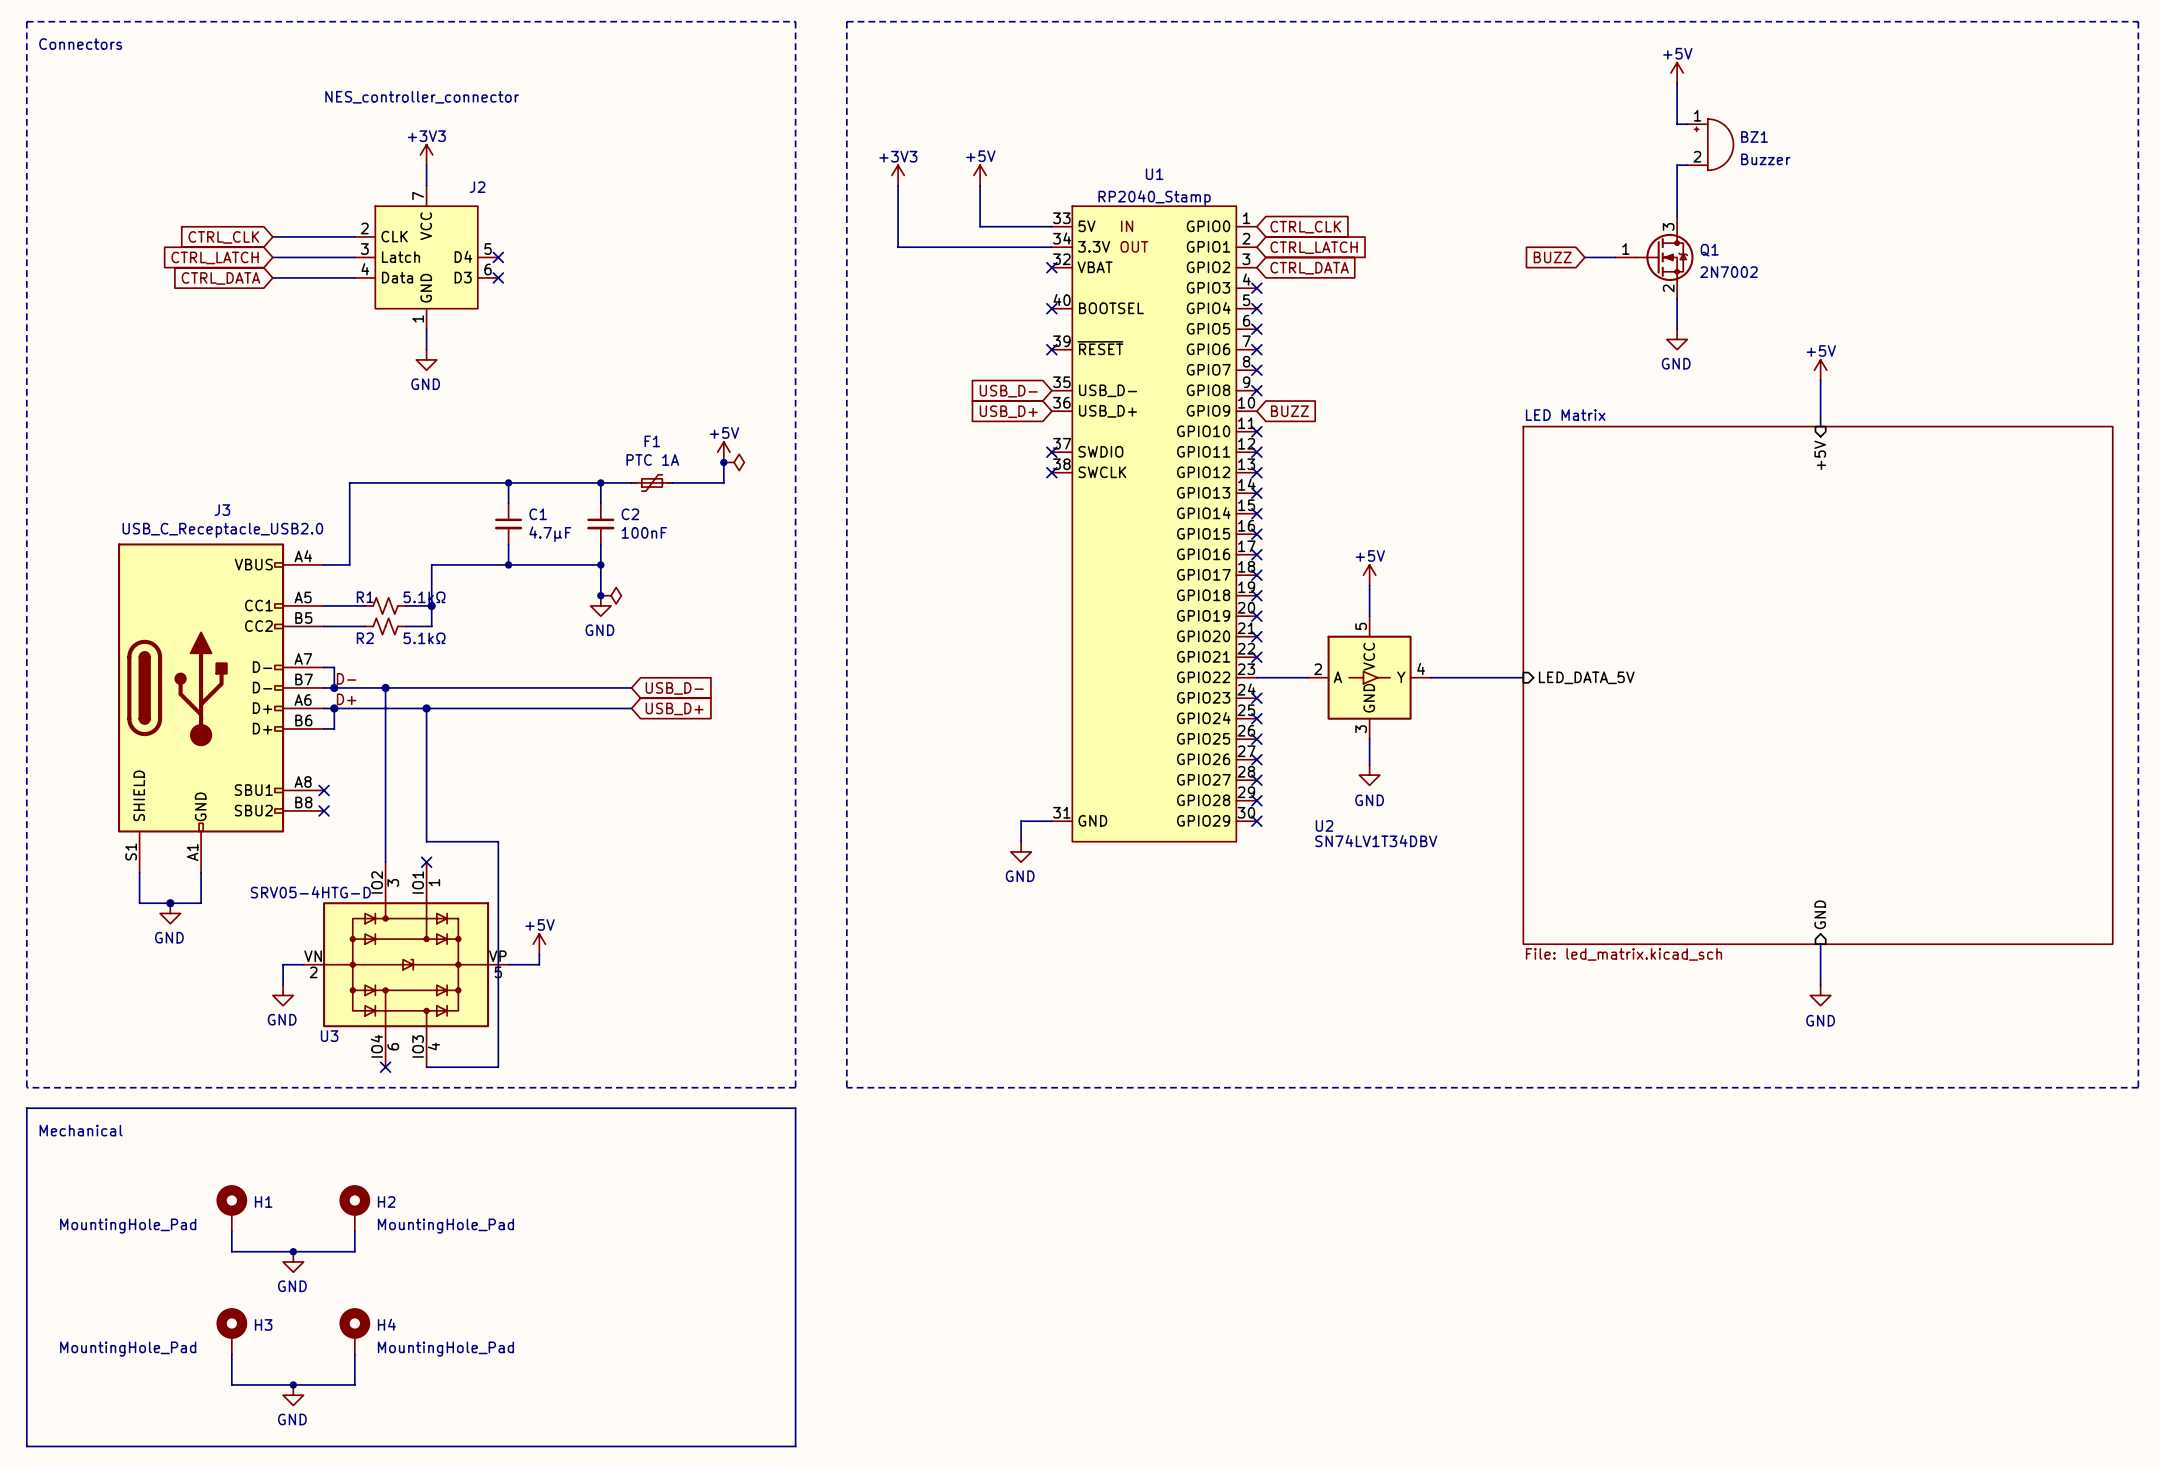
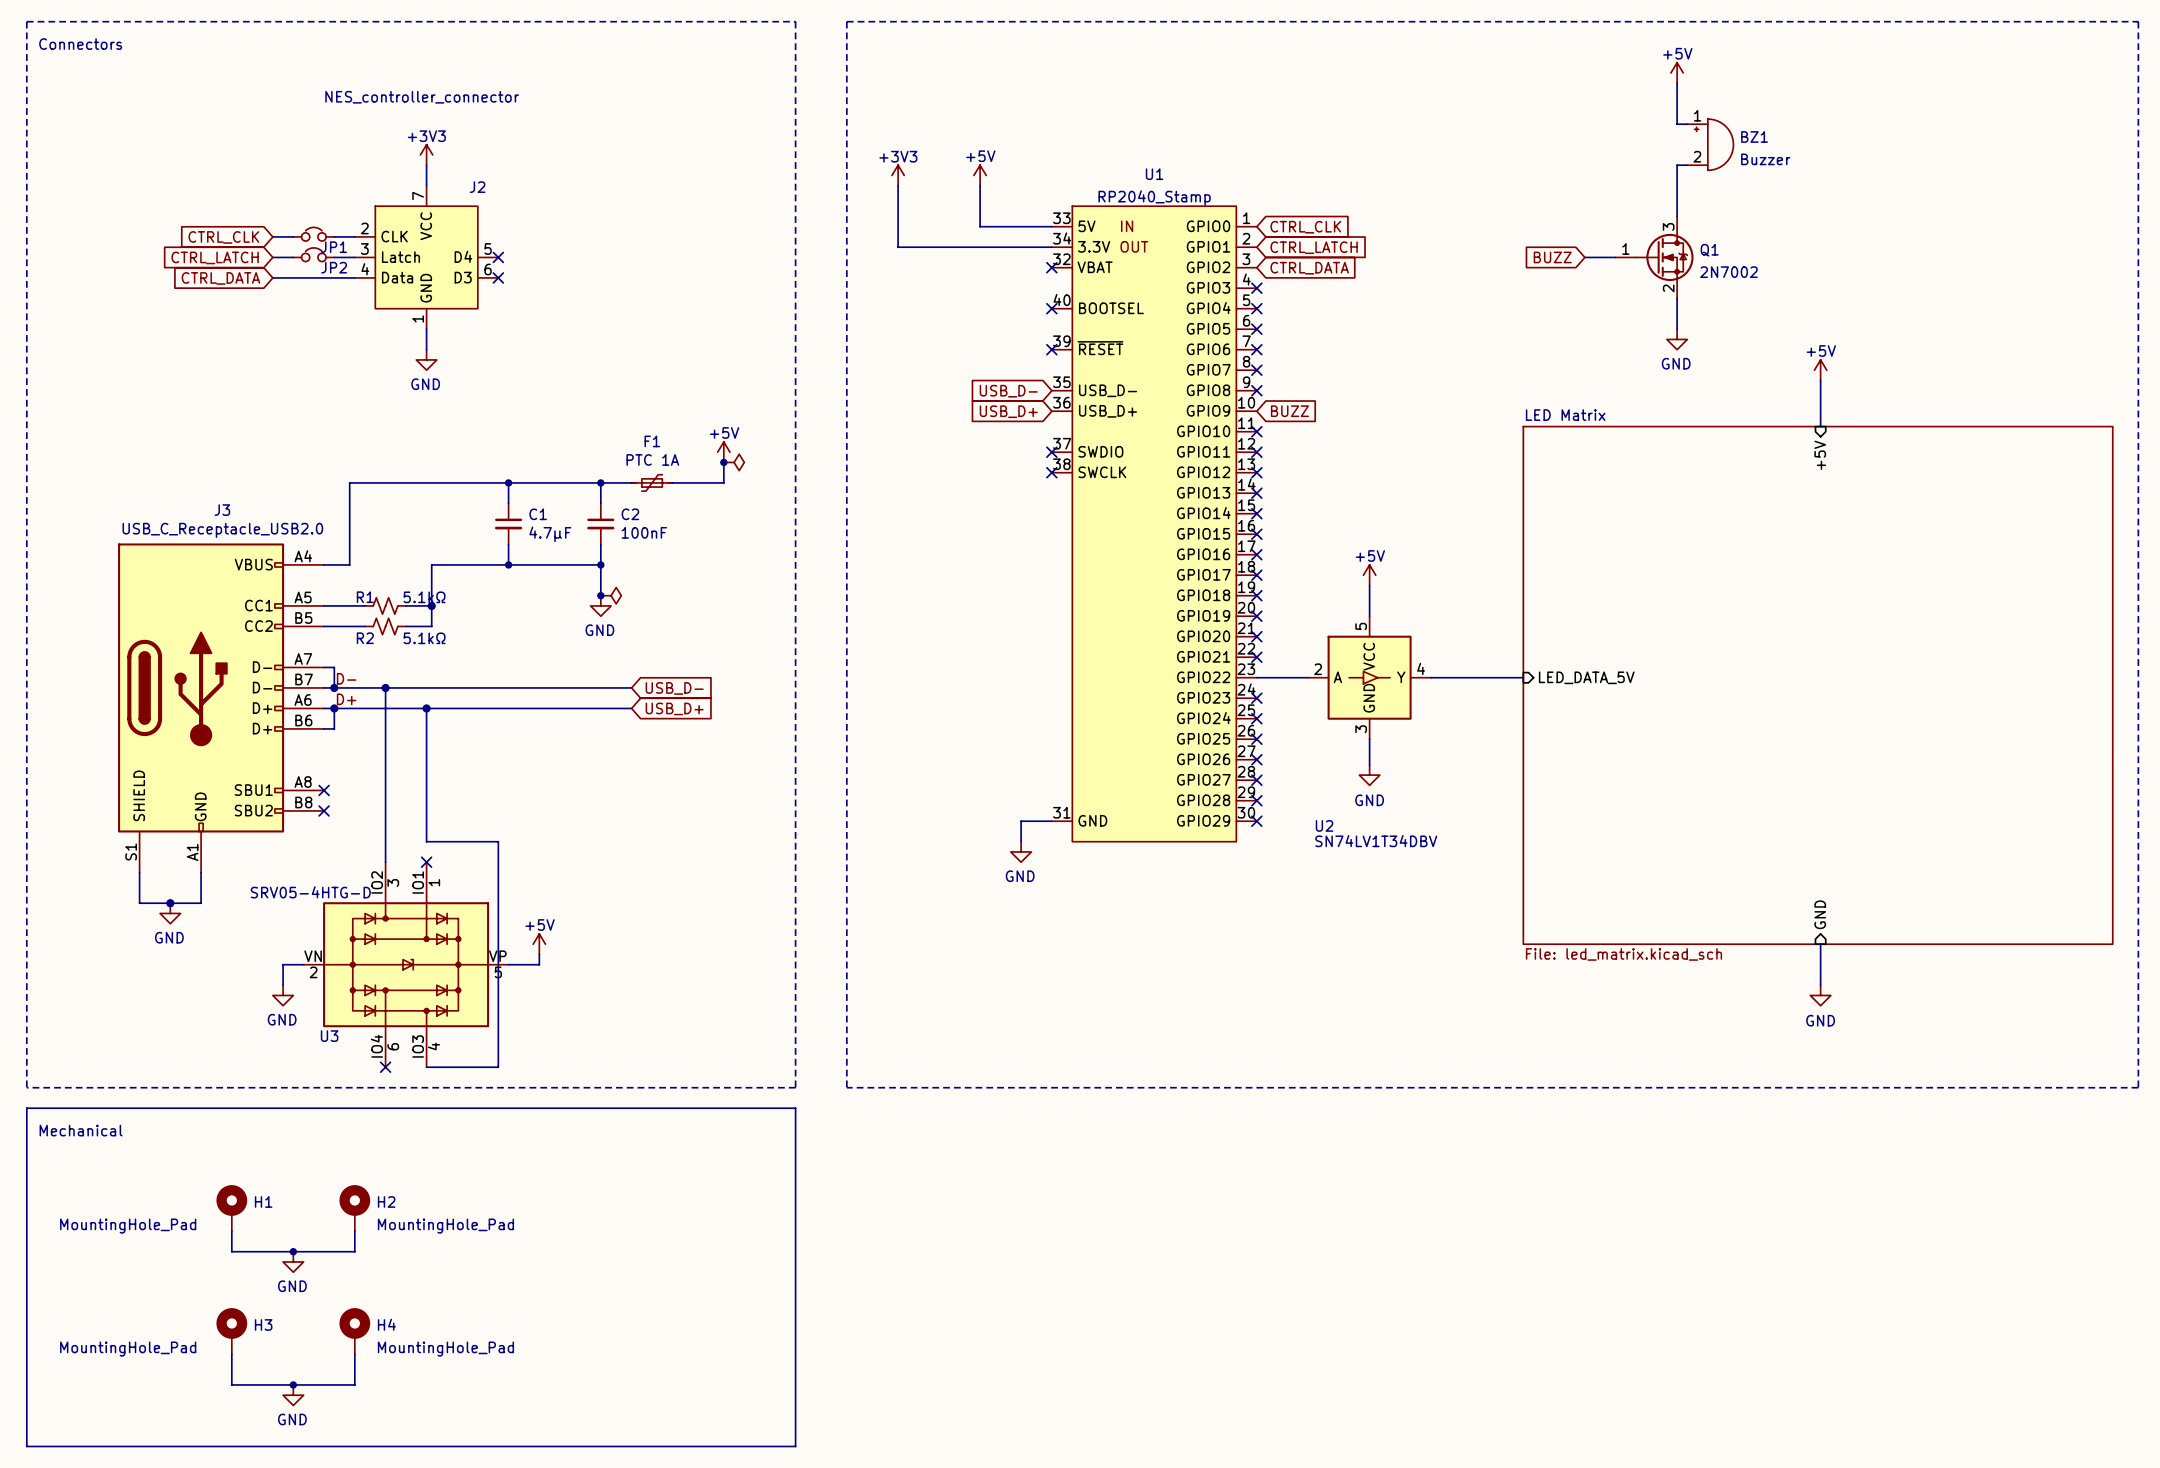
JP1: none -> (313, 234)
JP2: none -> (313, 254)

